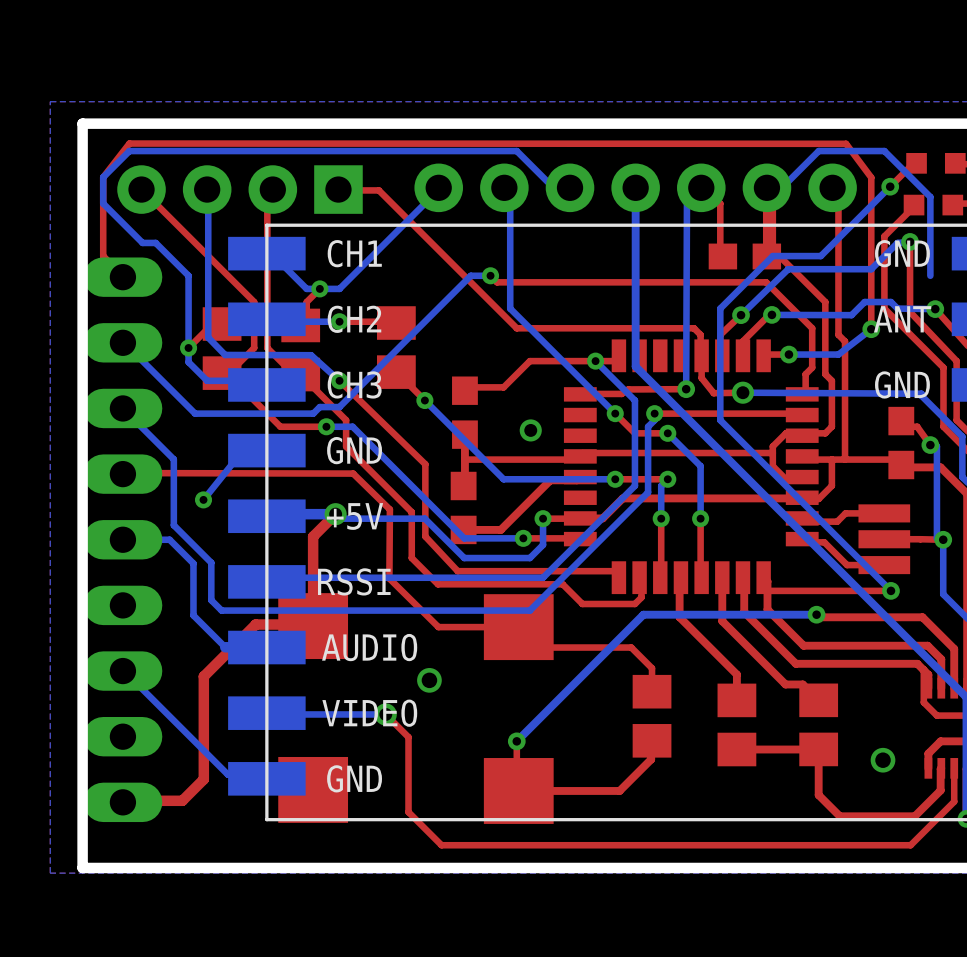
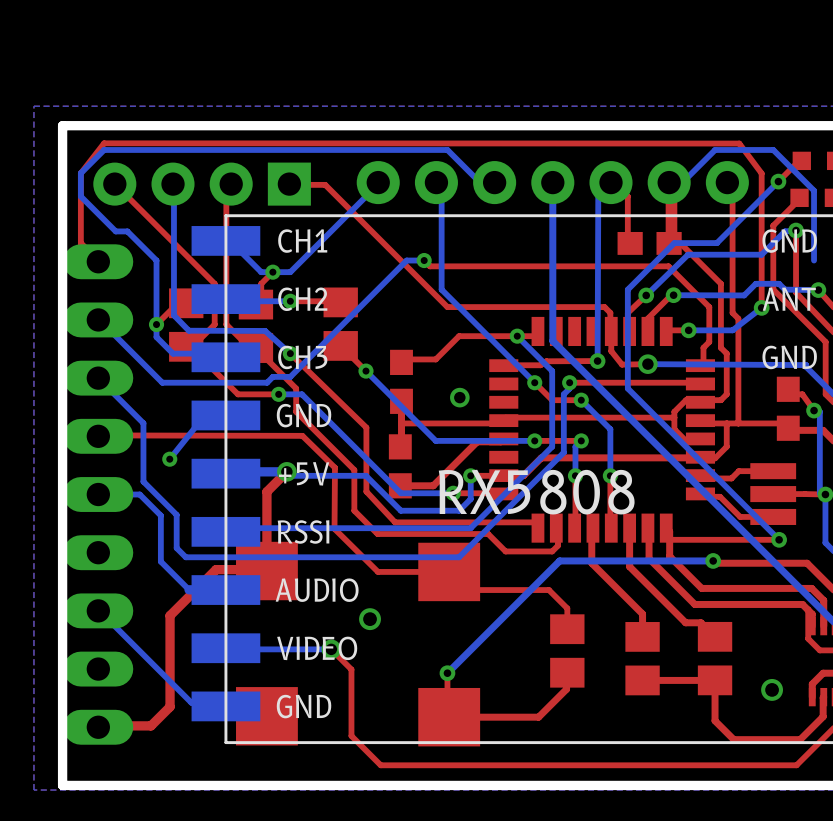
part text: none -> RX5808 (536, 492)

